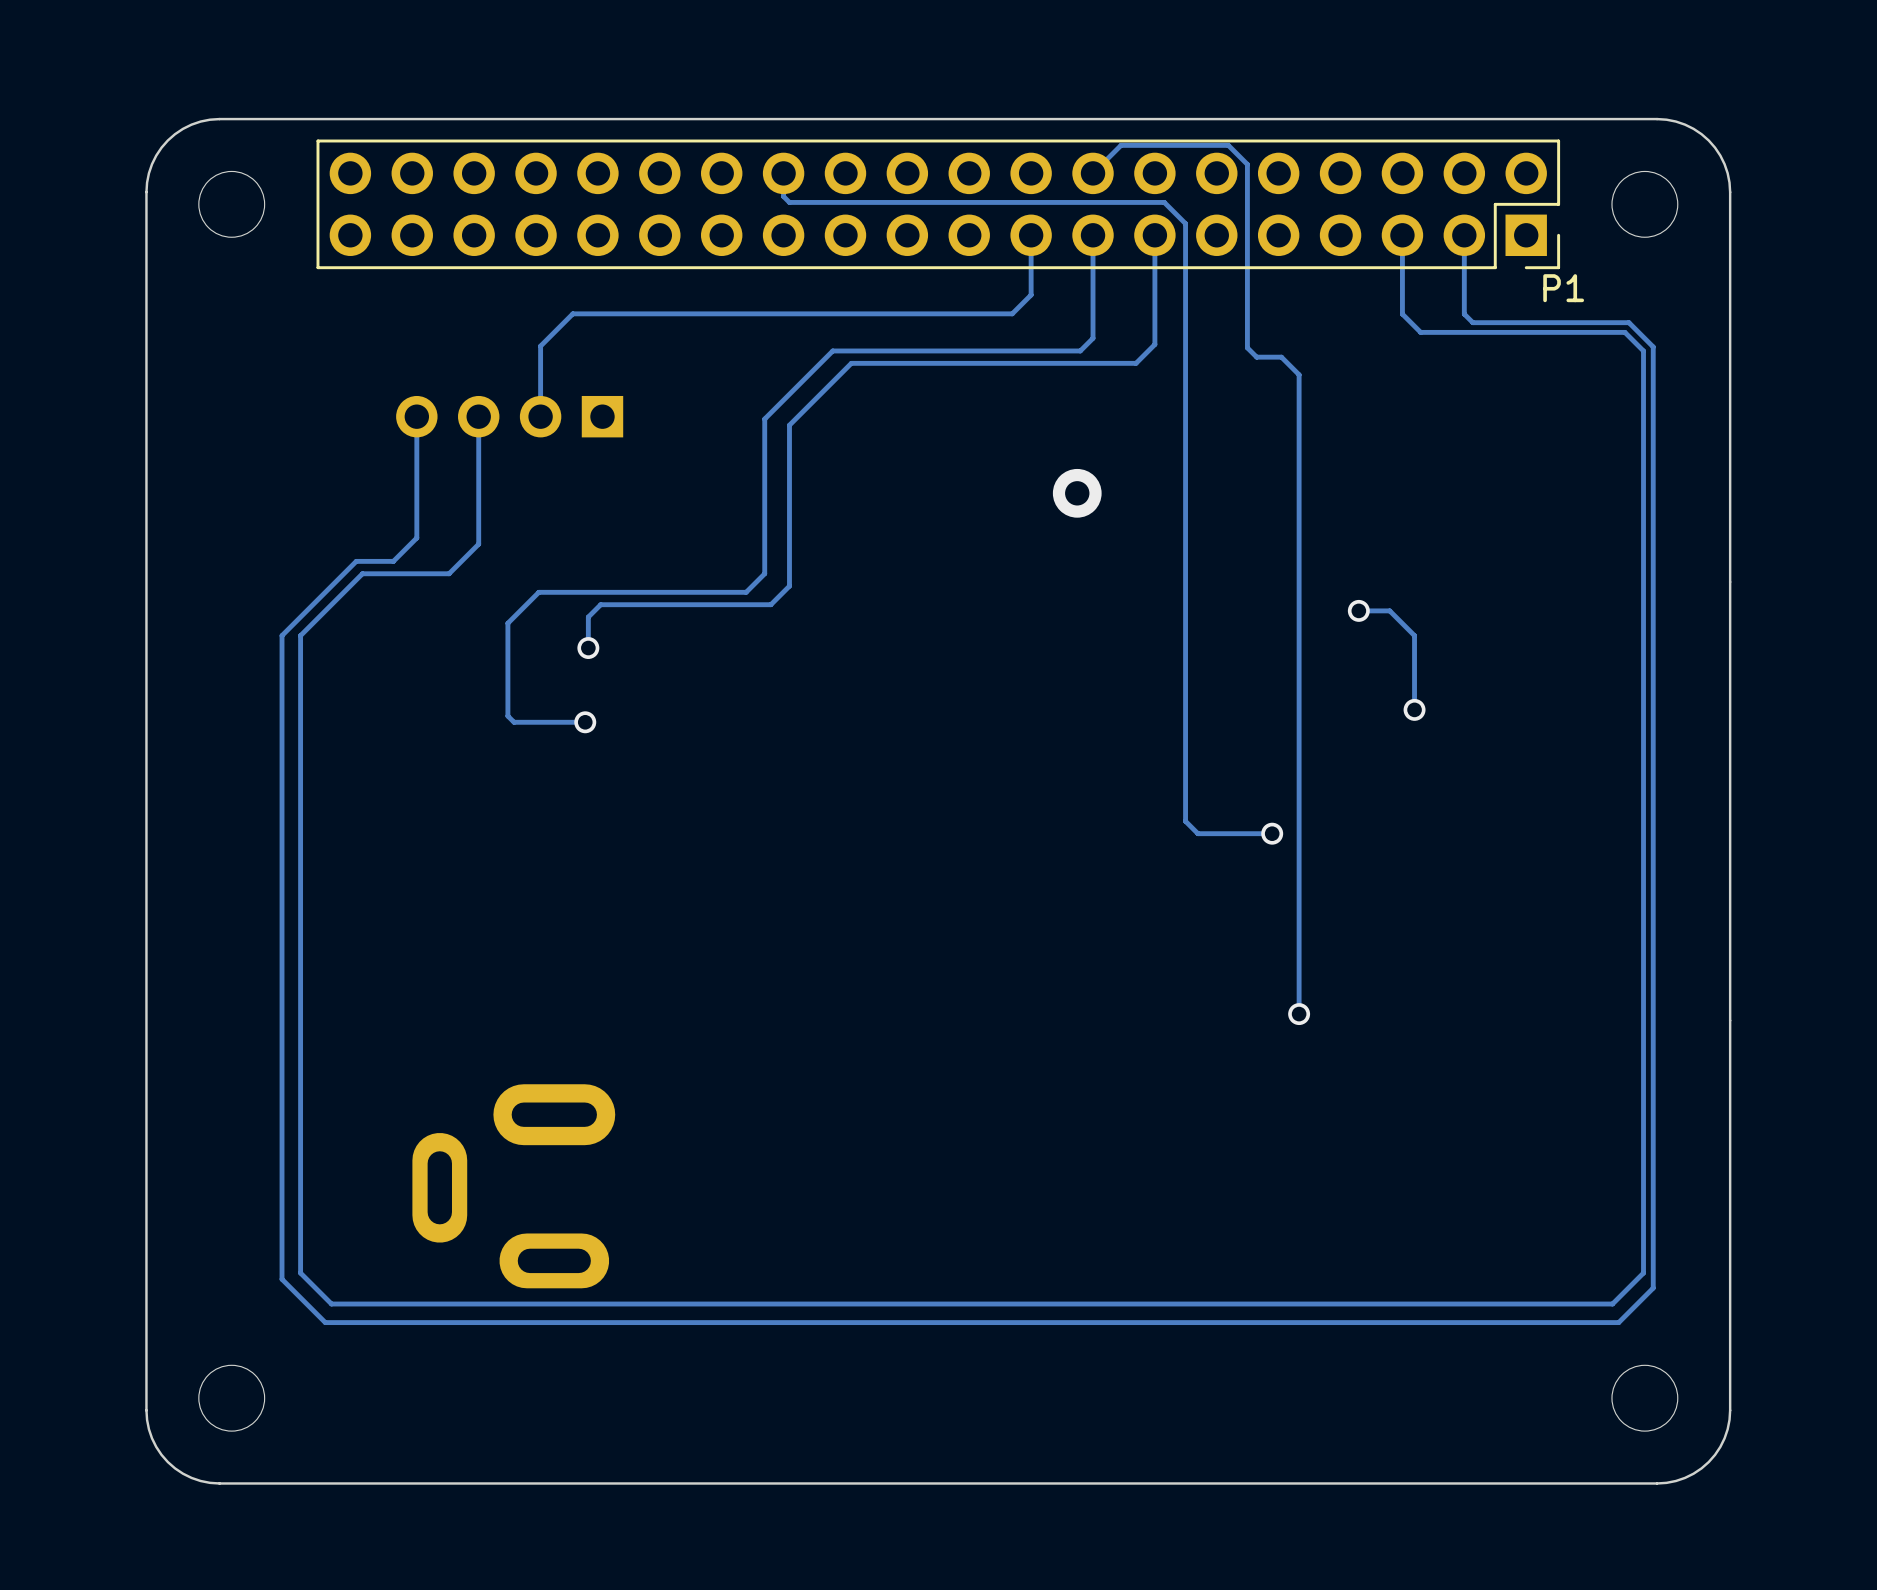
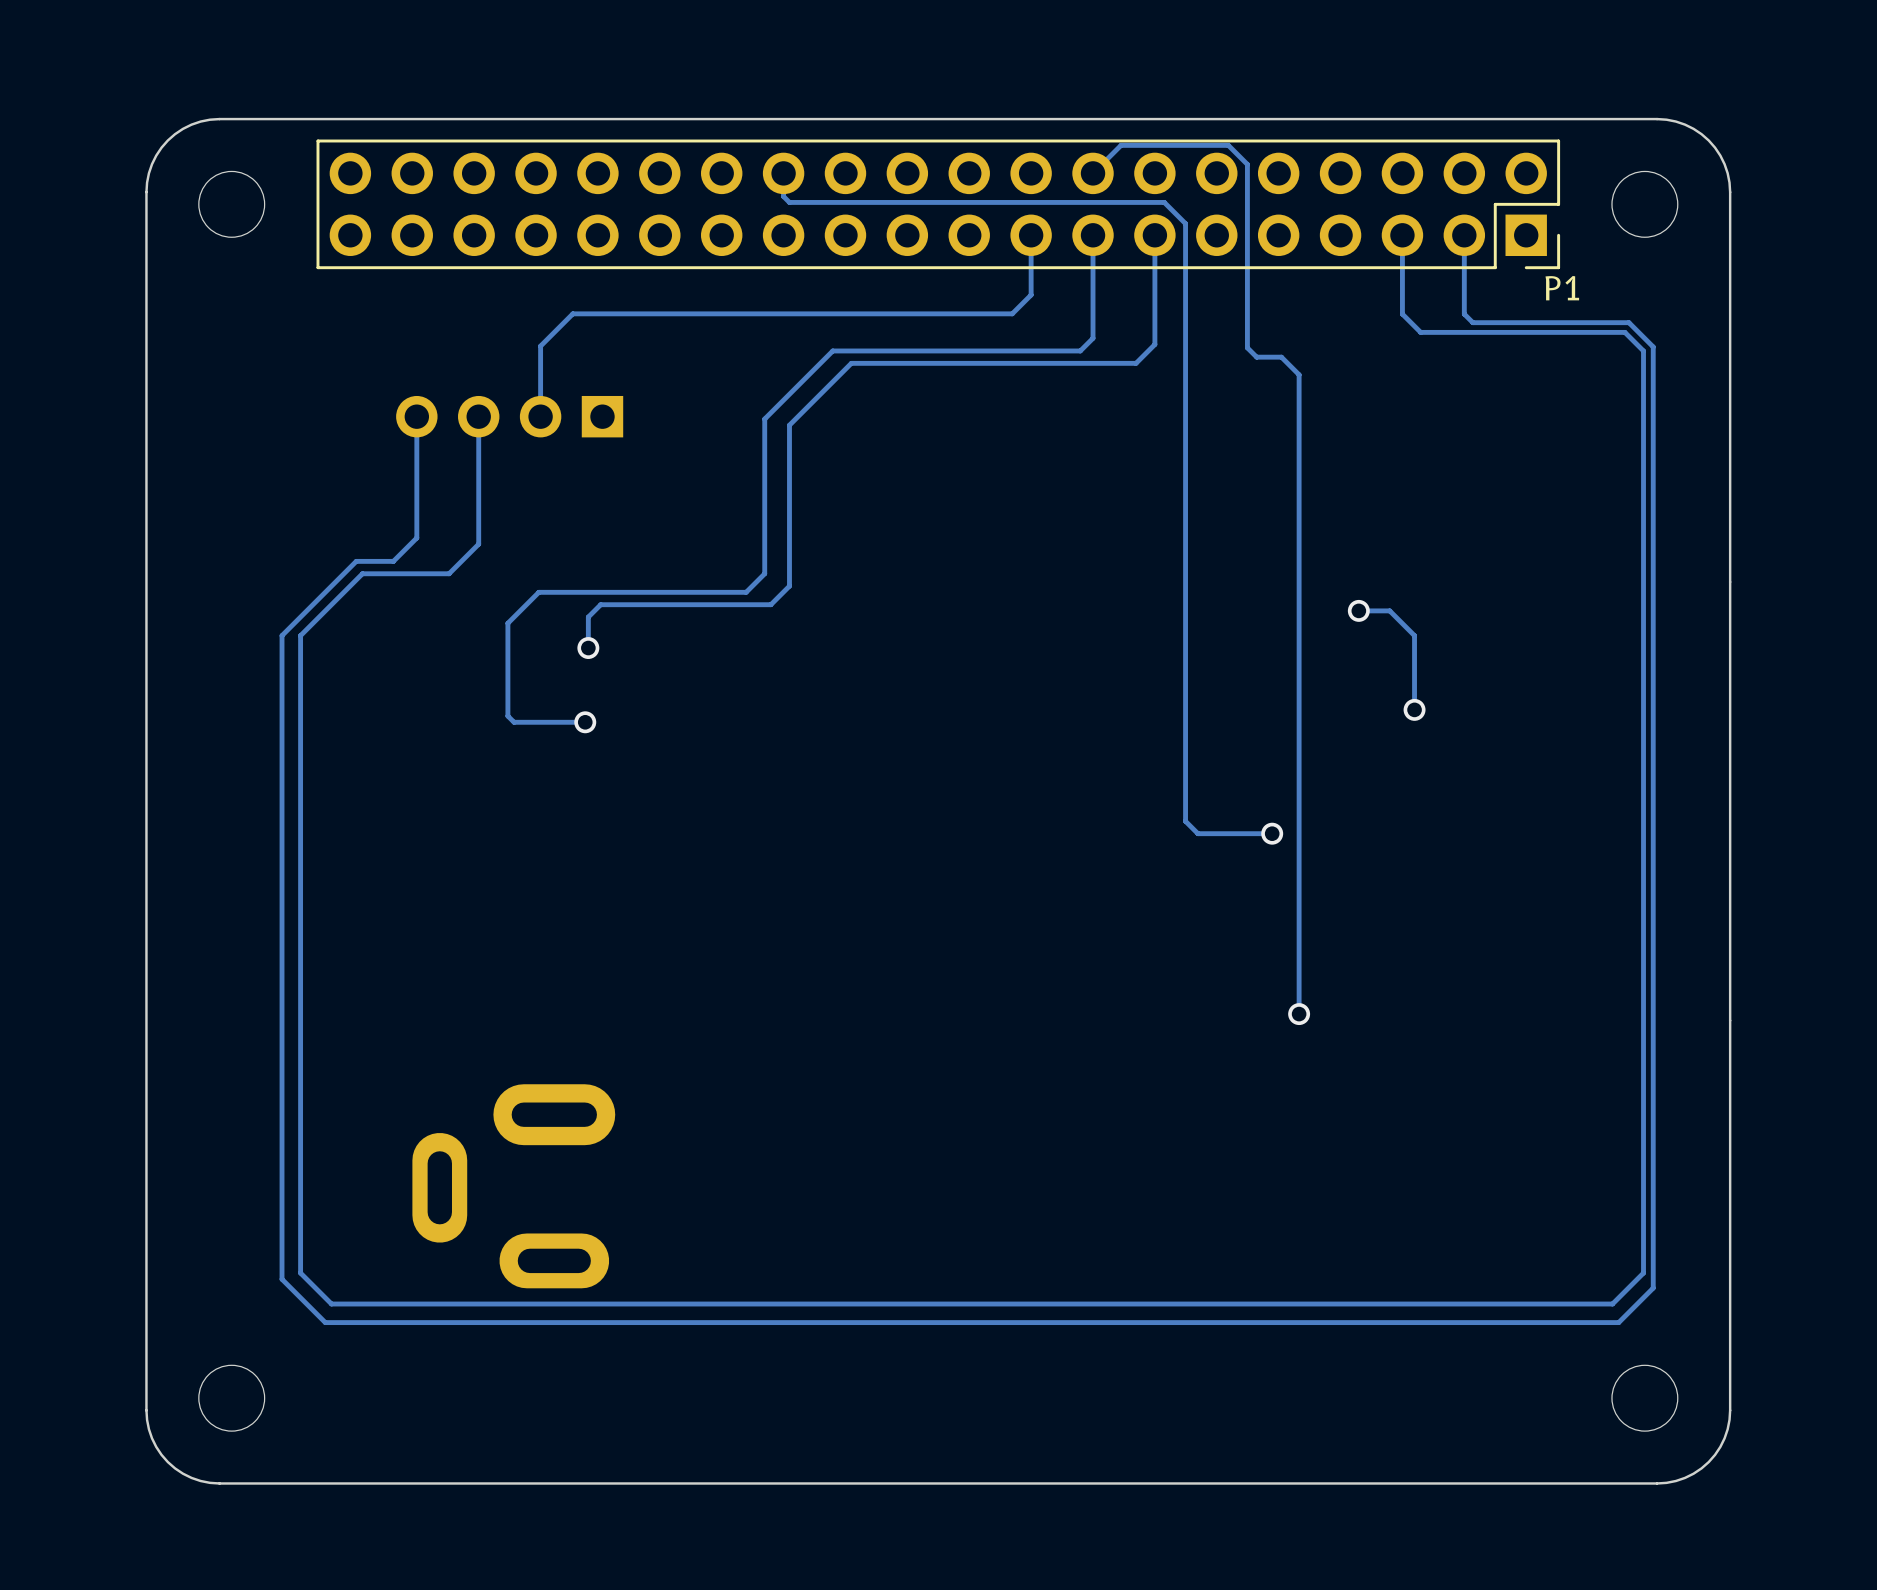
via: (1077, 493) -> none

